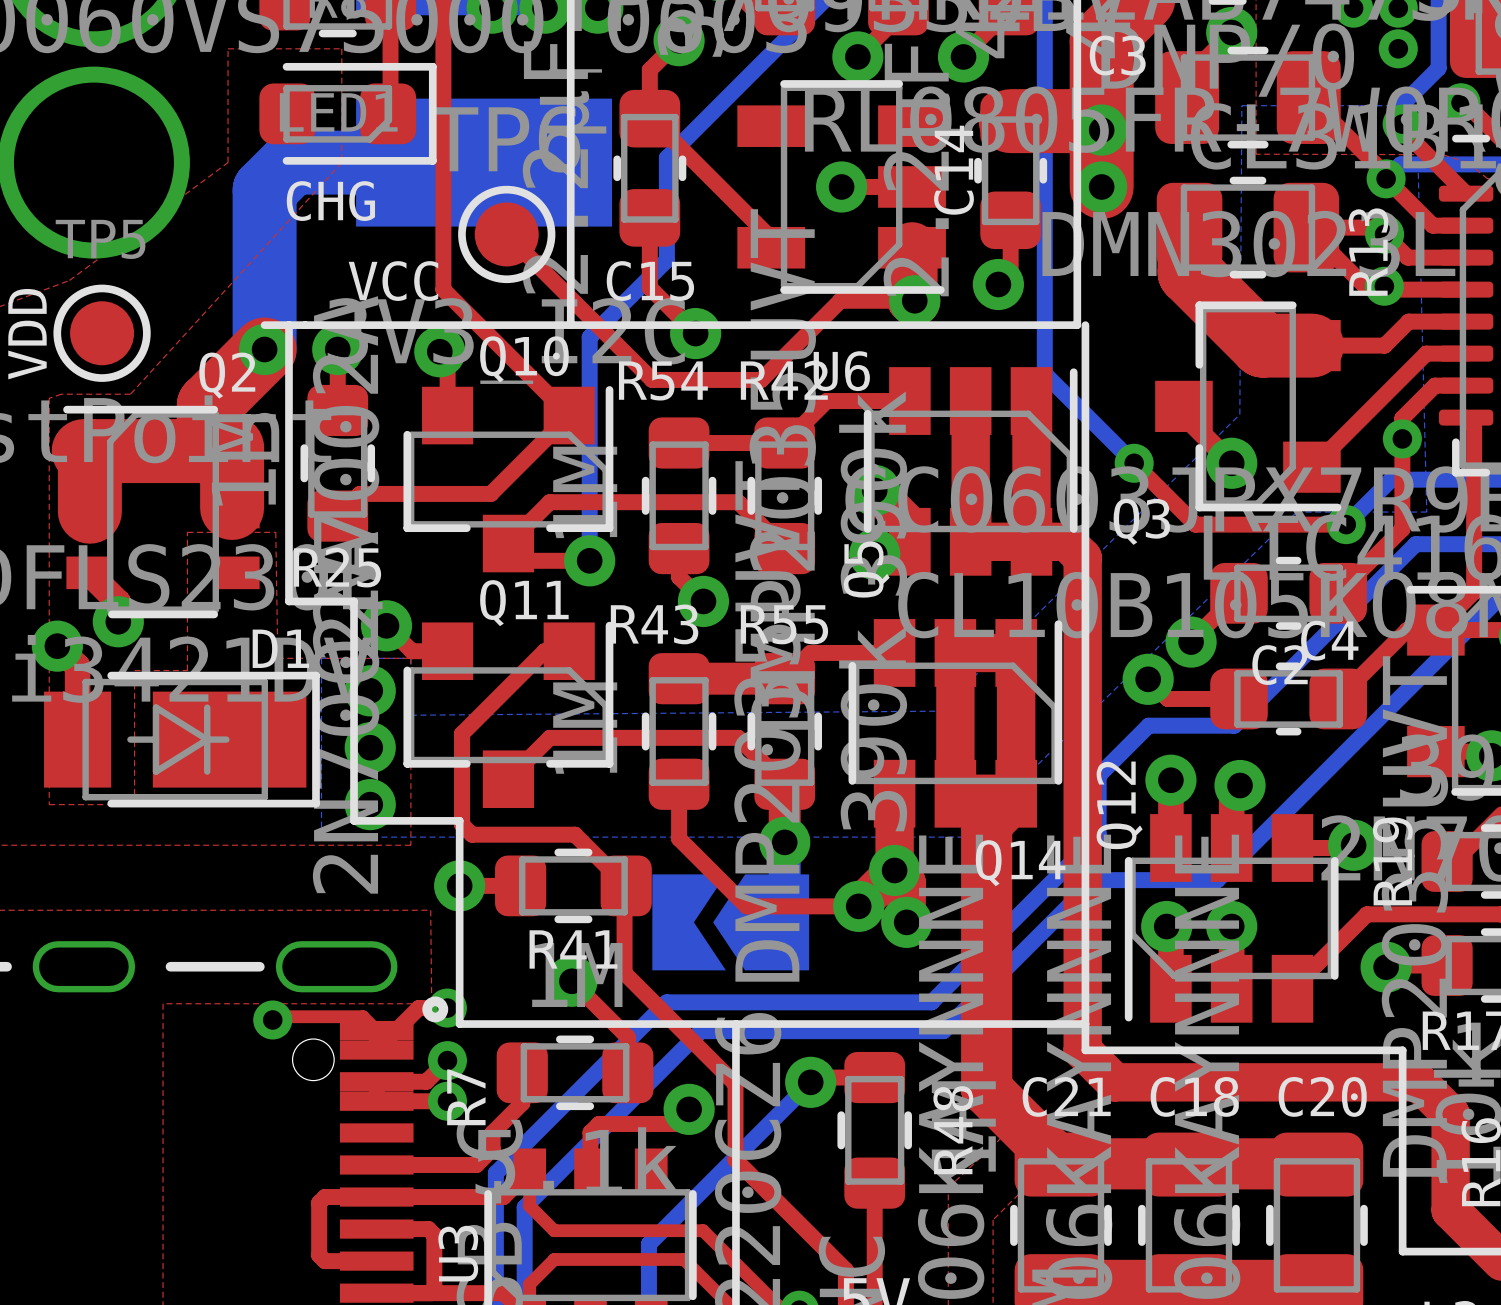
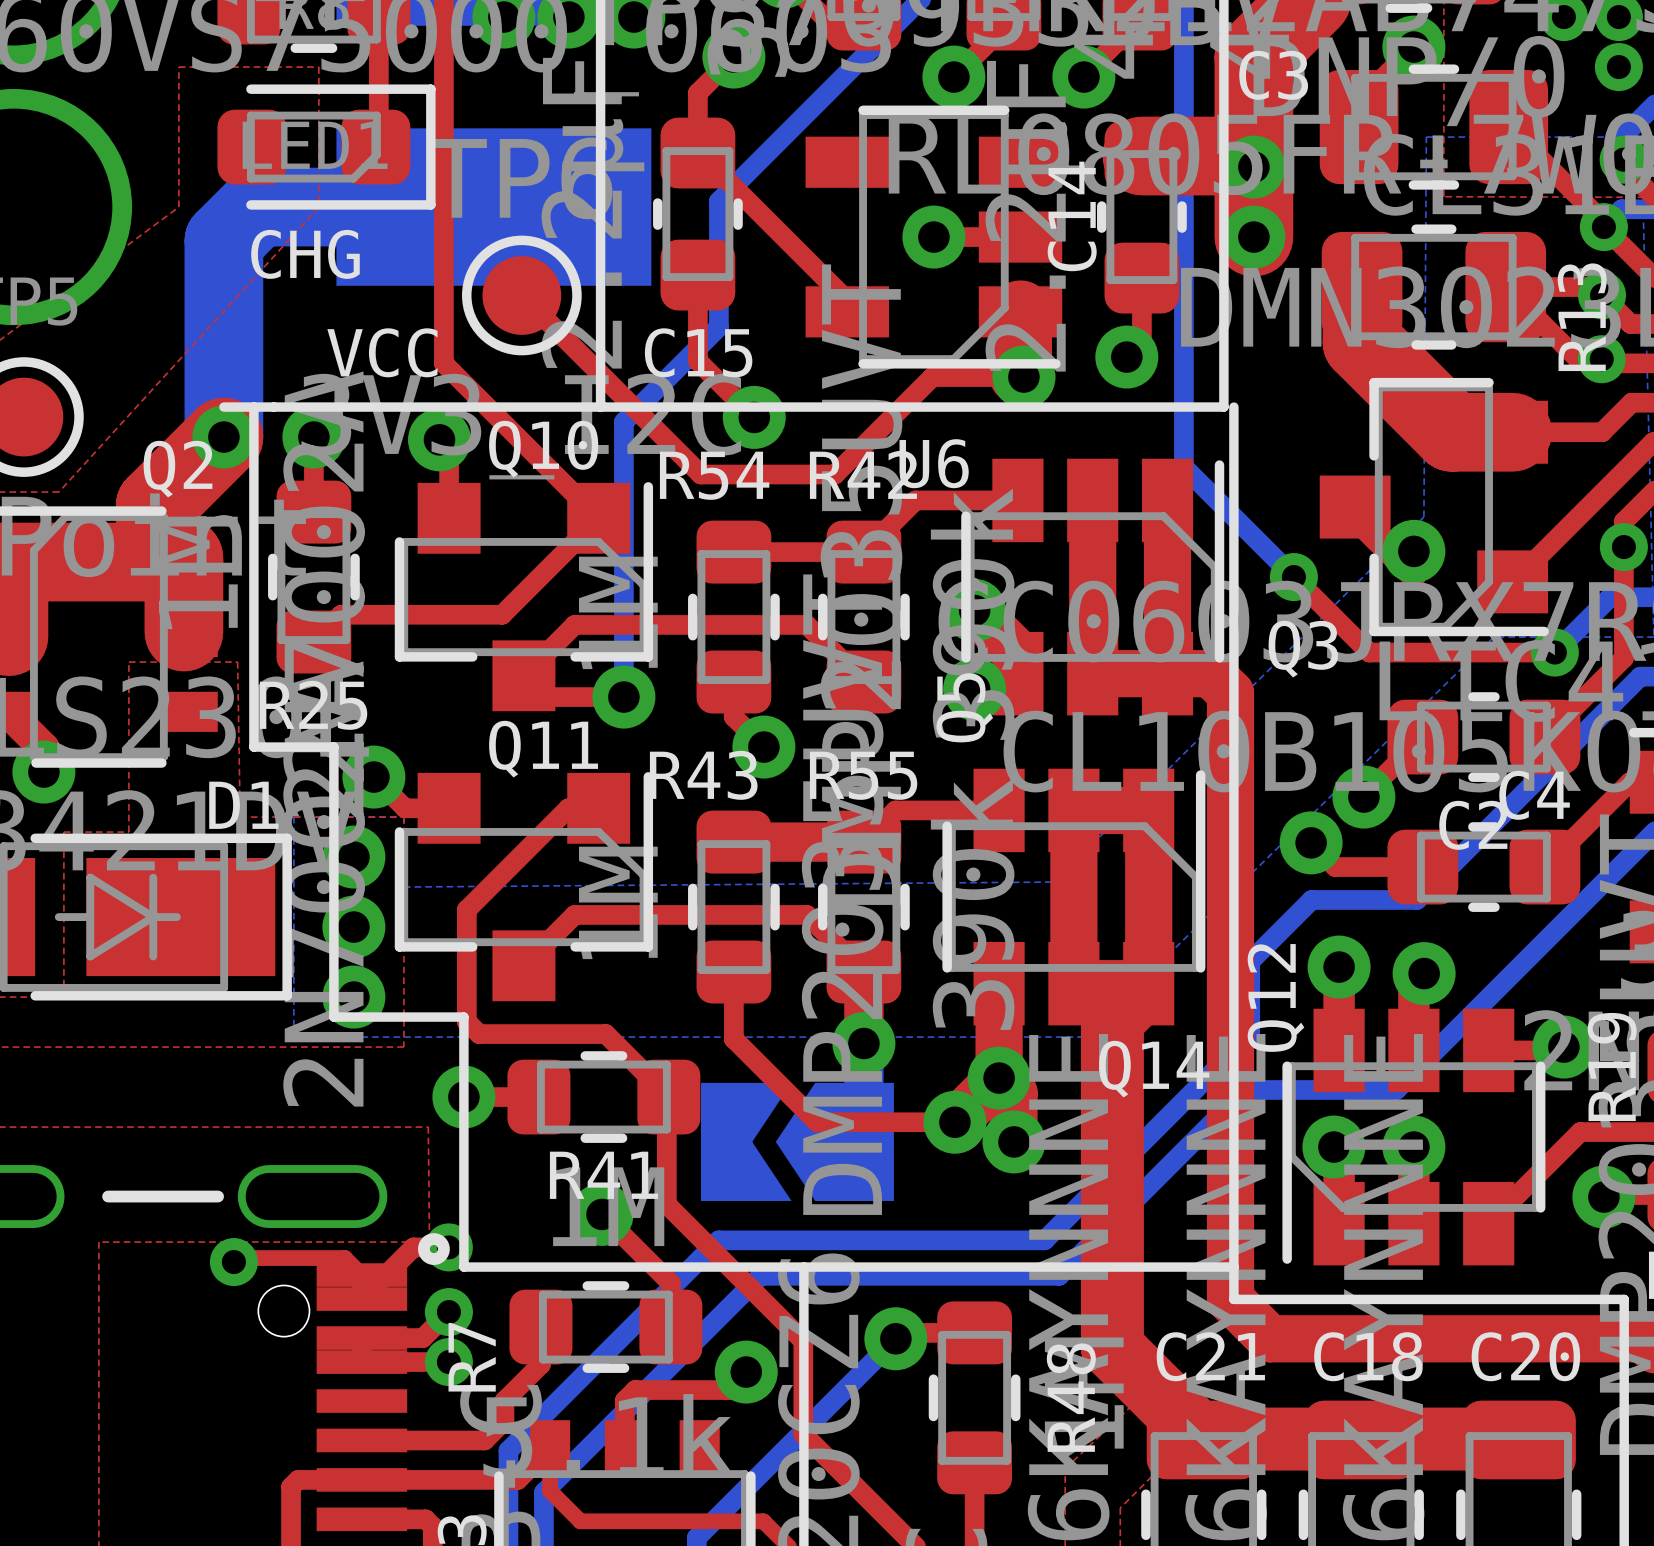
via position: (1231, 463) -> (1413, 551)

